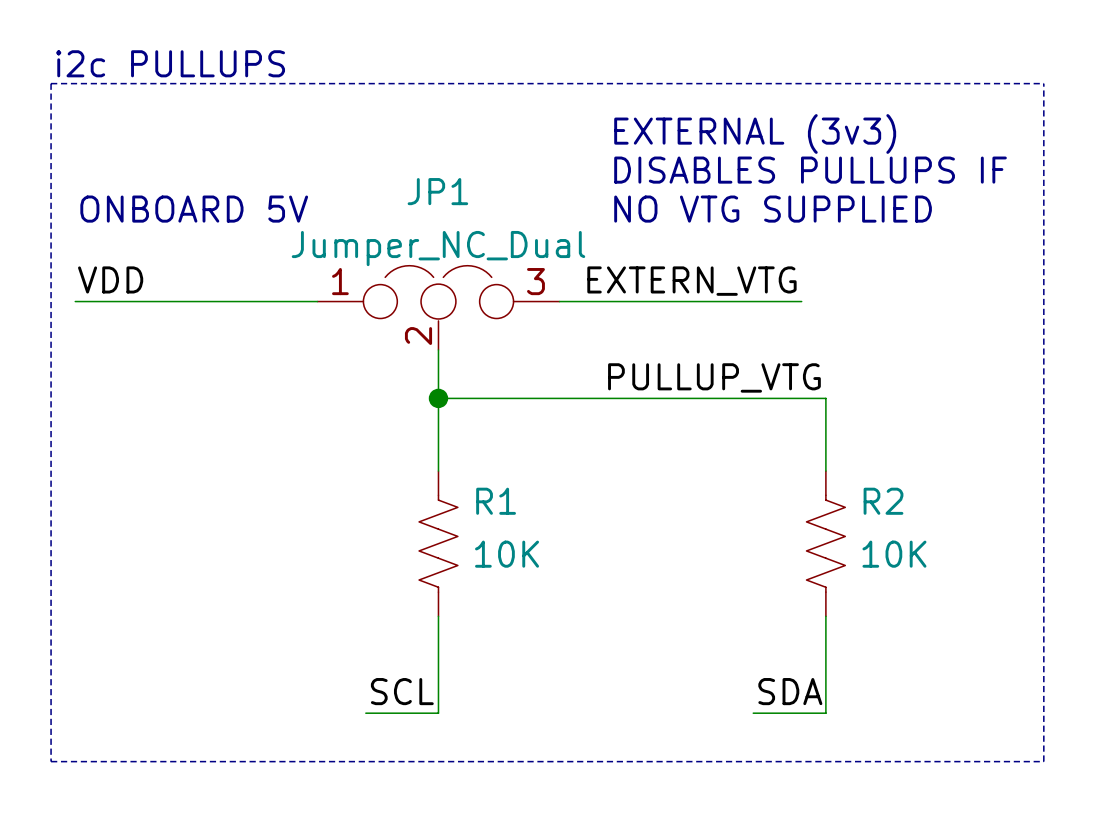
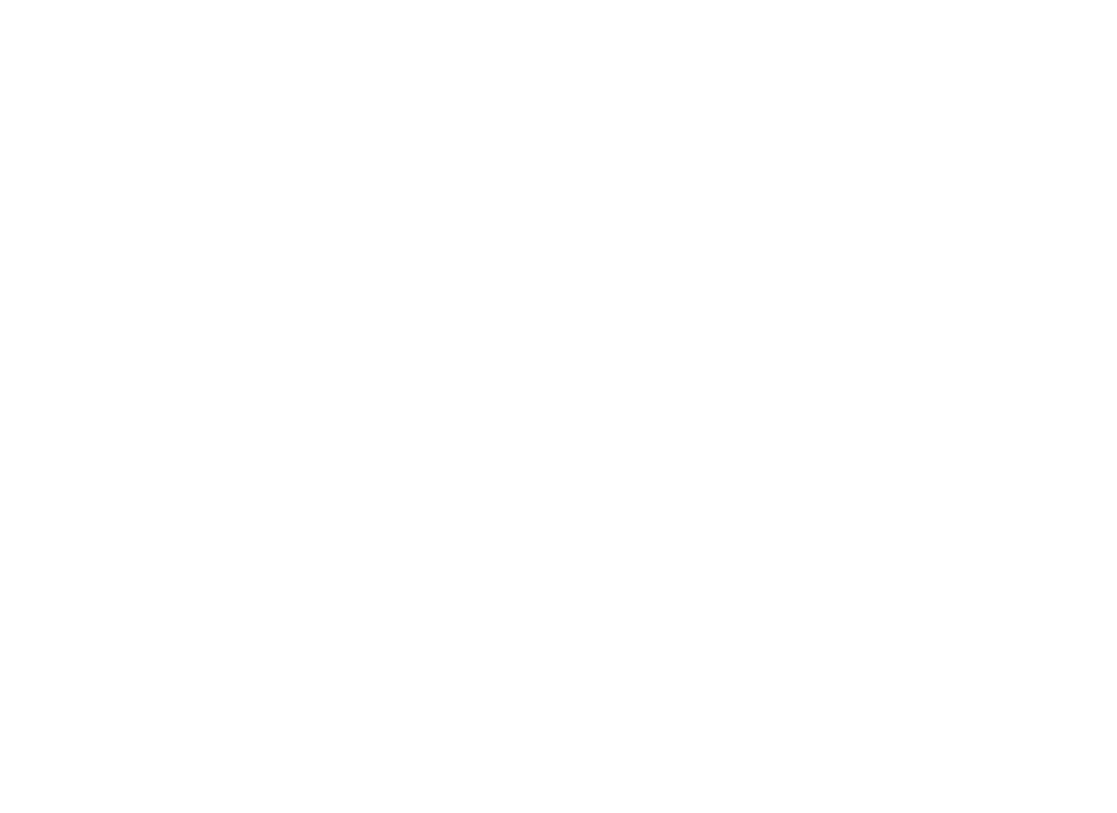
text: i2c PULLUPS (170, 63) -> none
line: (51, 83) (51, 761) (1043, 761) (1043, 83) (51, 83) -> none
text: EXTERNAL (3v3) (755, 133) -> none
text: DISABLES PULLUPS IF (810, 170) -> none
text: ONBOARD 5V (194, 209) -> none
text: NO VTG SUPPLIED (773, 209) -> none
label: VDD (110, 279) -> none
label: EXTERN_VTG (691, 281) -> none
wire: (75, 301) (317, 301) -> none
wire: (559, 301) (801, 301) -> none
JP1: Jumper_NC_Dual (438, 307) -> none
wire: (438, 349) (438, 471) -> none
label: PULLUP_VTG (714, 377) -> none
wire: (438, 398) (825, 398) (825, 471) -> none
junction: (438, 398) -> none
R1: 10K (438, 543) -> none
R2: 10K (825, 543) -> none
wire: (438, 616) (438, 713) (365, 713) -> none
wire: (825, 616) (825, 713) (753, 713) -> none
label: SCL (402, 691) -> none
label: SDA (790, 691) -> none

